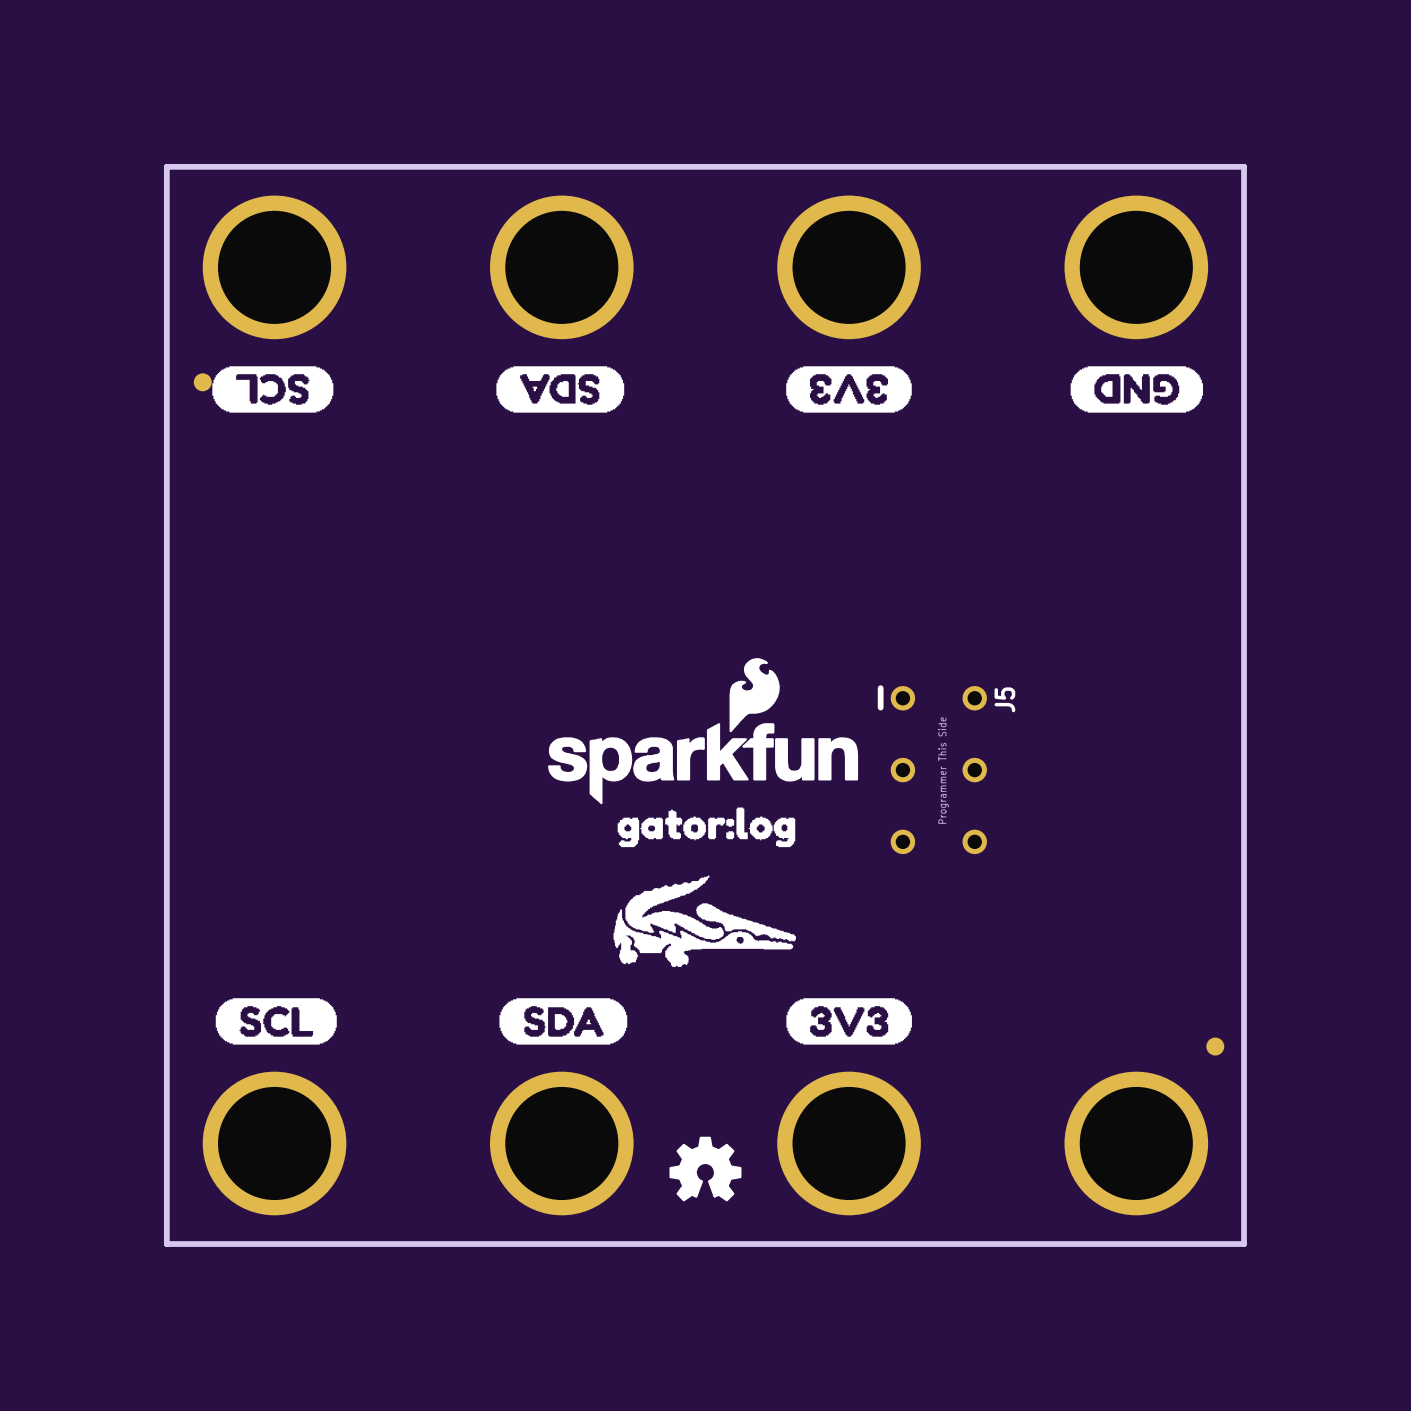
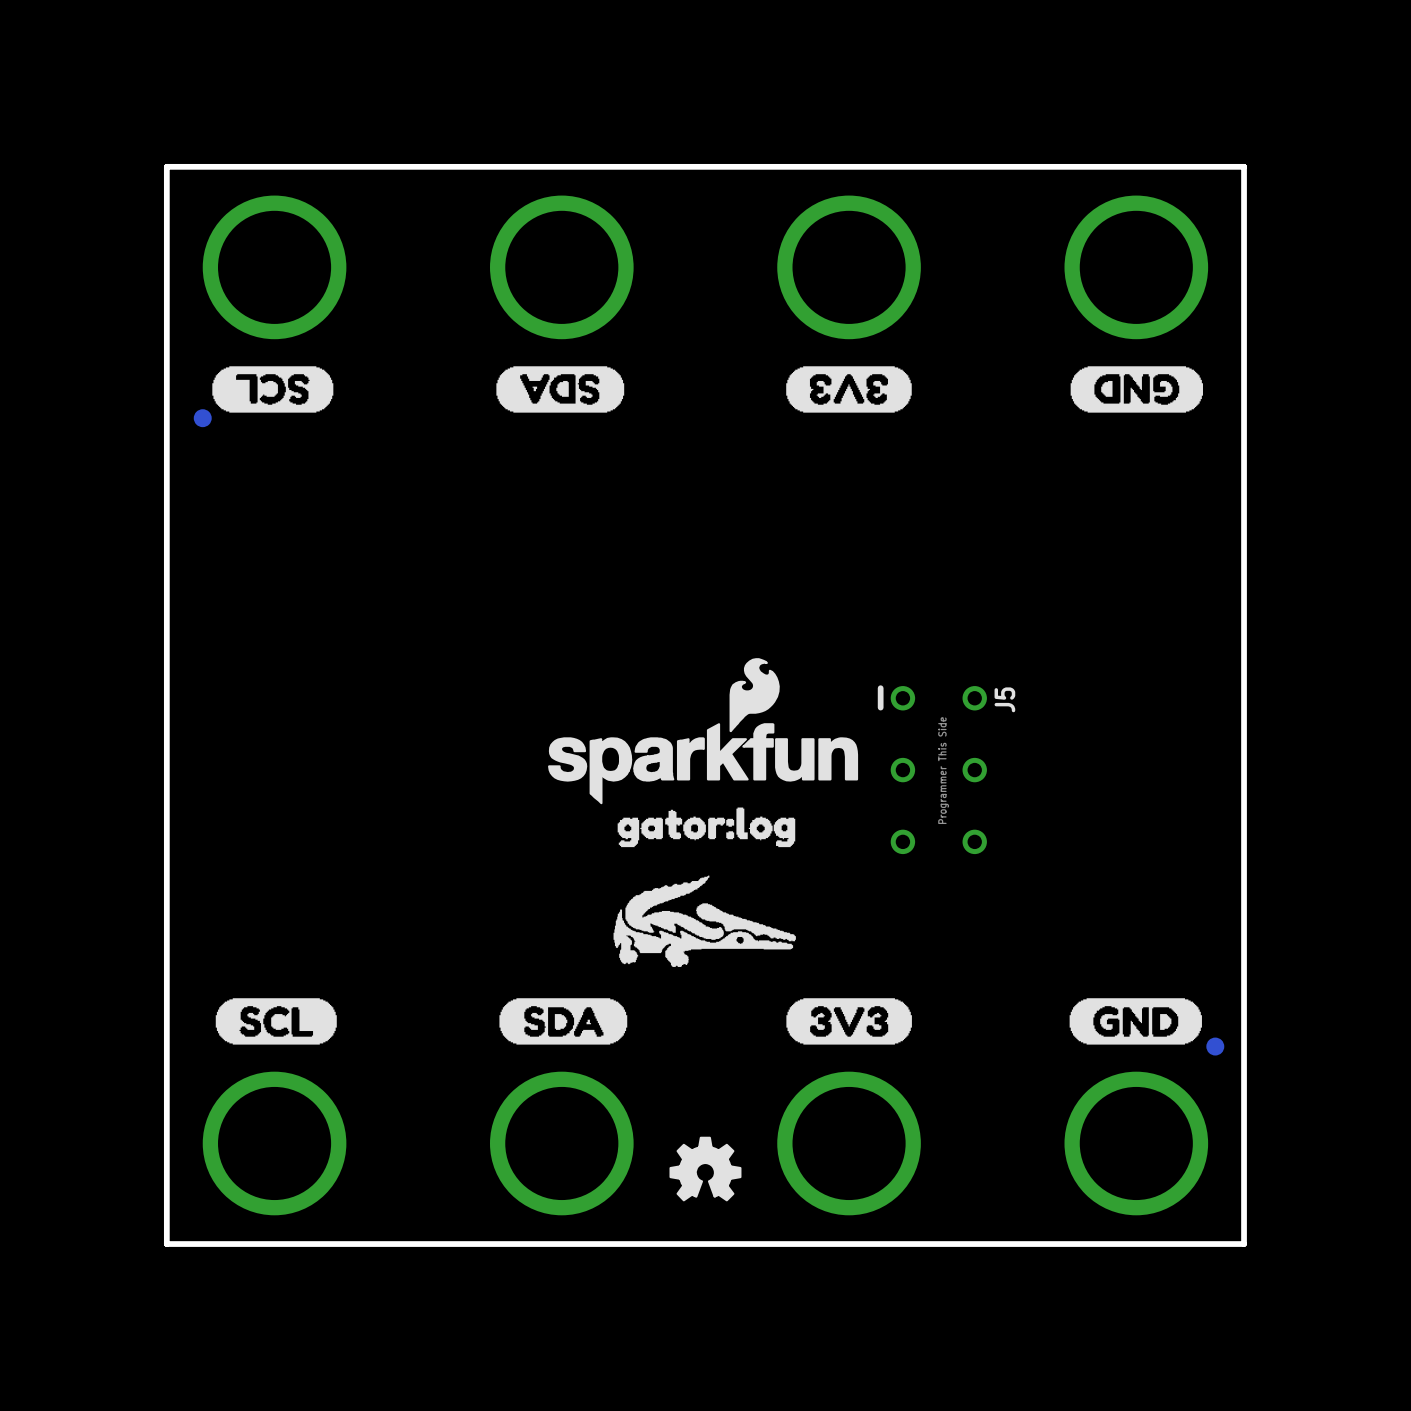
part position: (202, 382) -> (202, 418)
drawing: none -> [1069, 998, 1202, 1045]

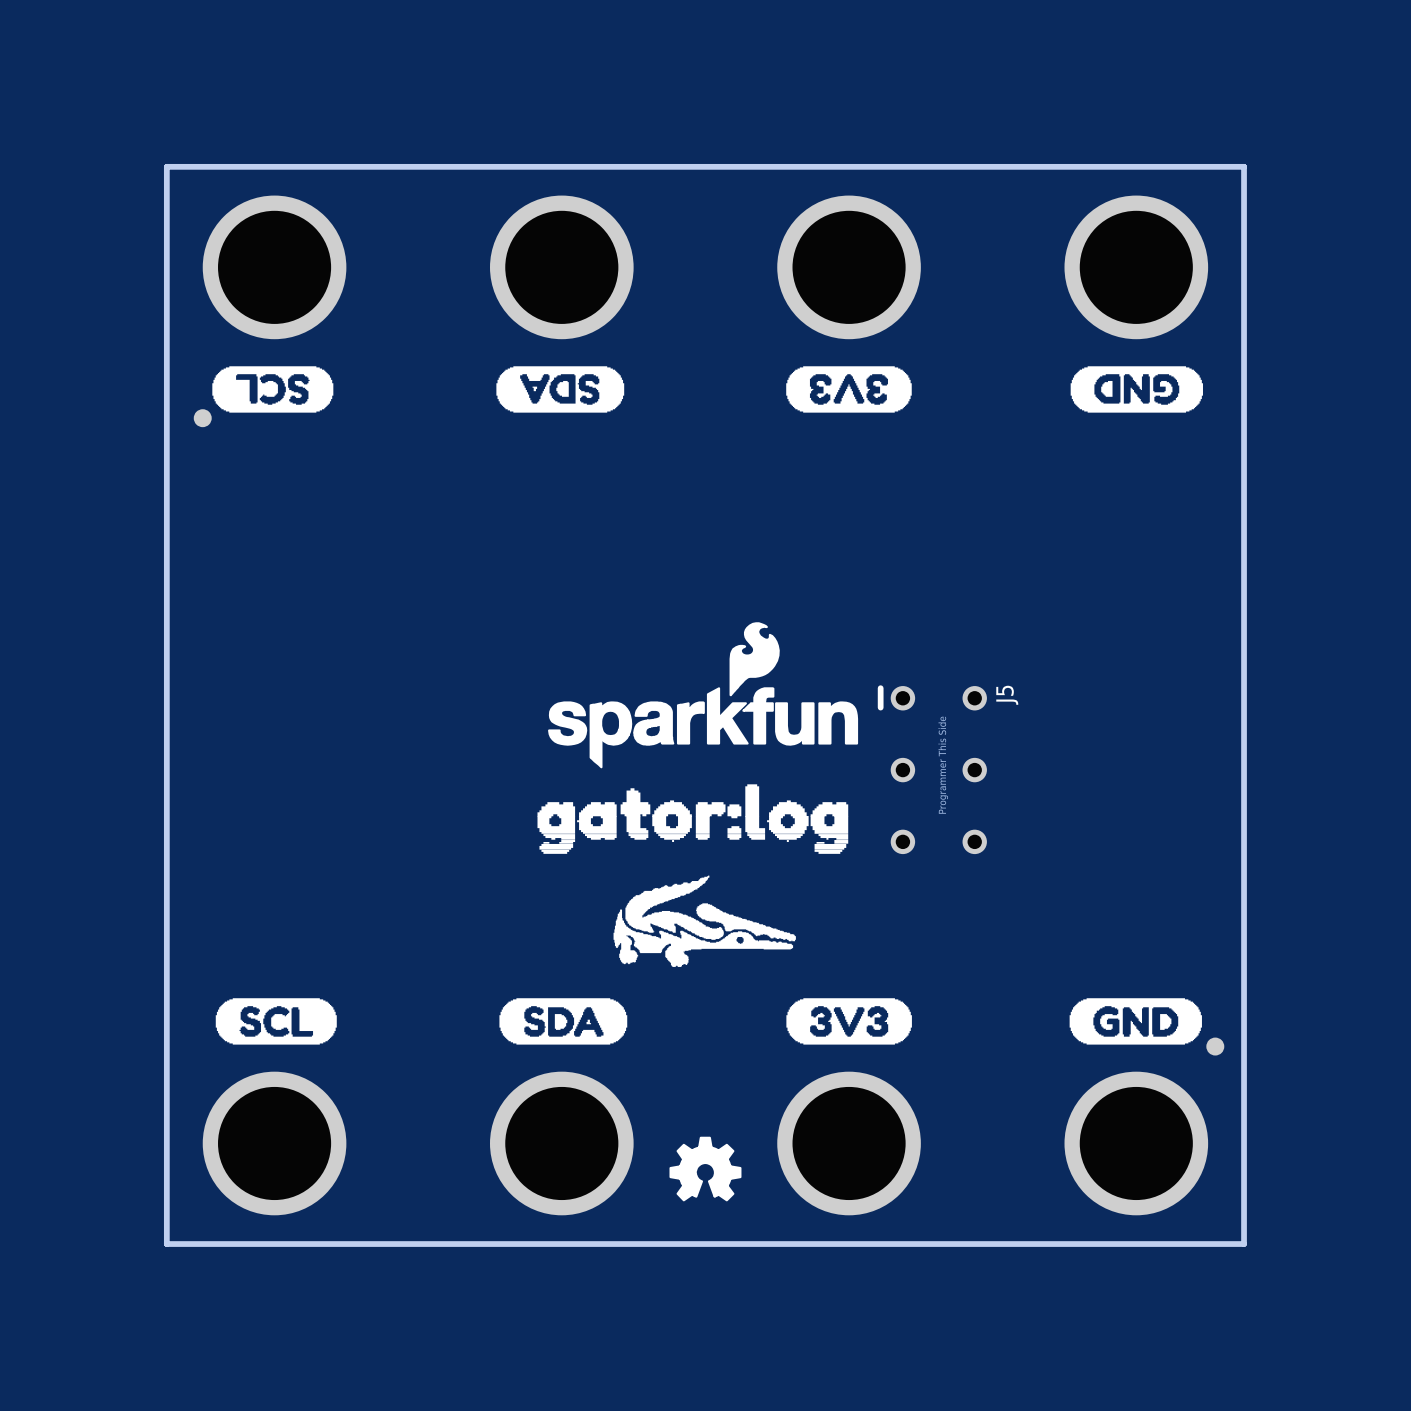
drawing position: (703, 731) -> (703, 695)
drawing shape: [617, 807, 796, 848] -> [537, 784, 849, 854]

